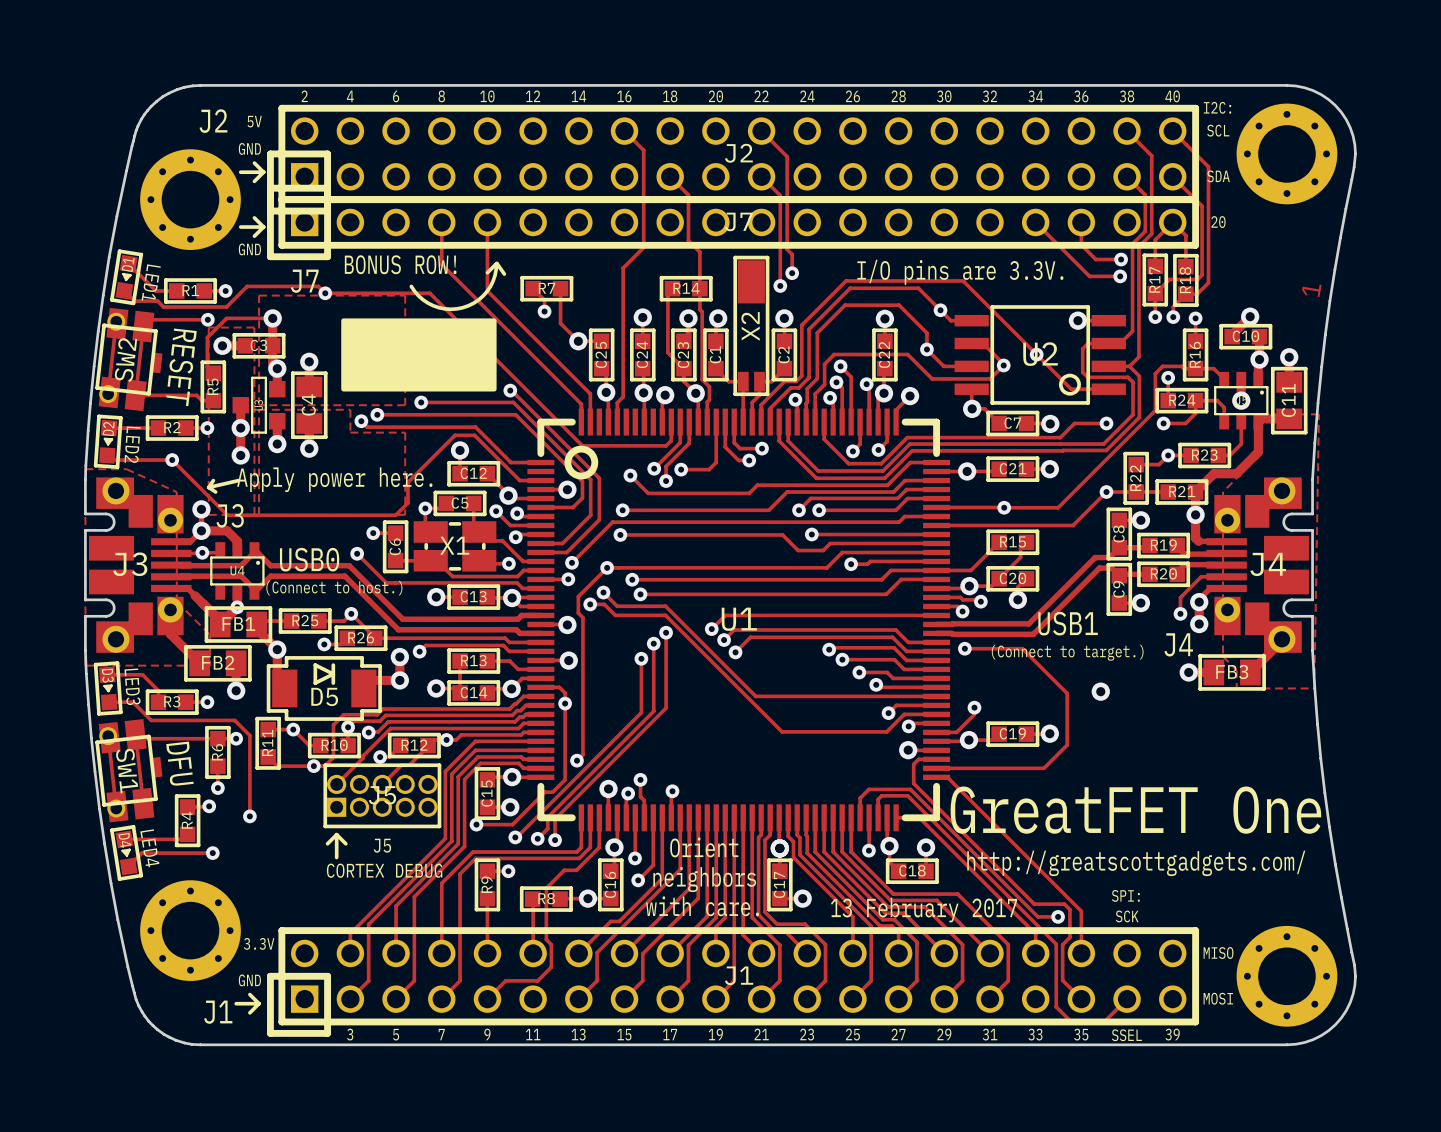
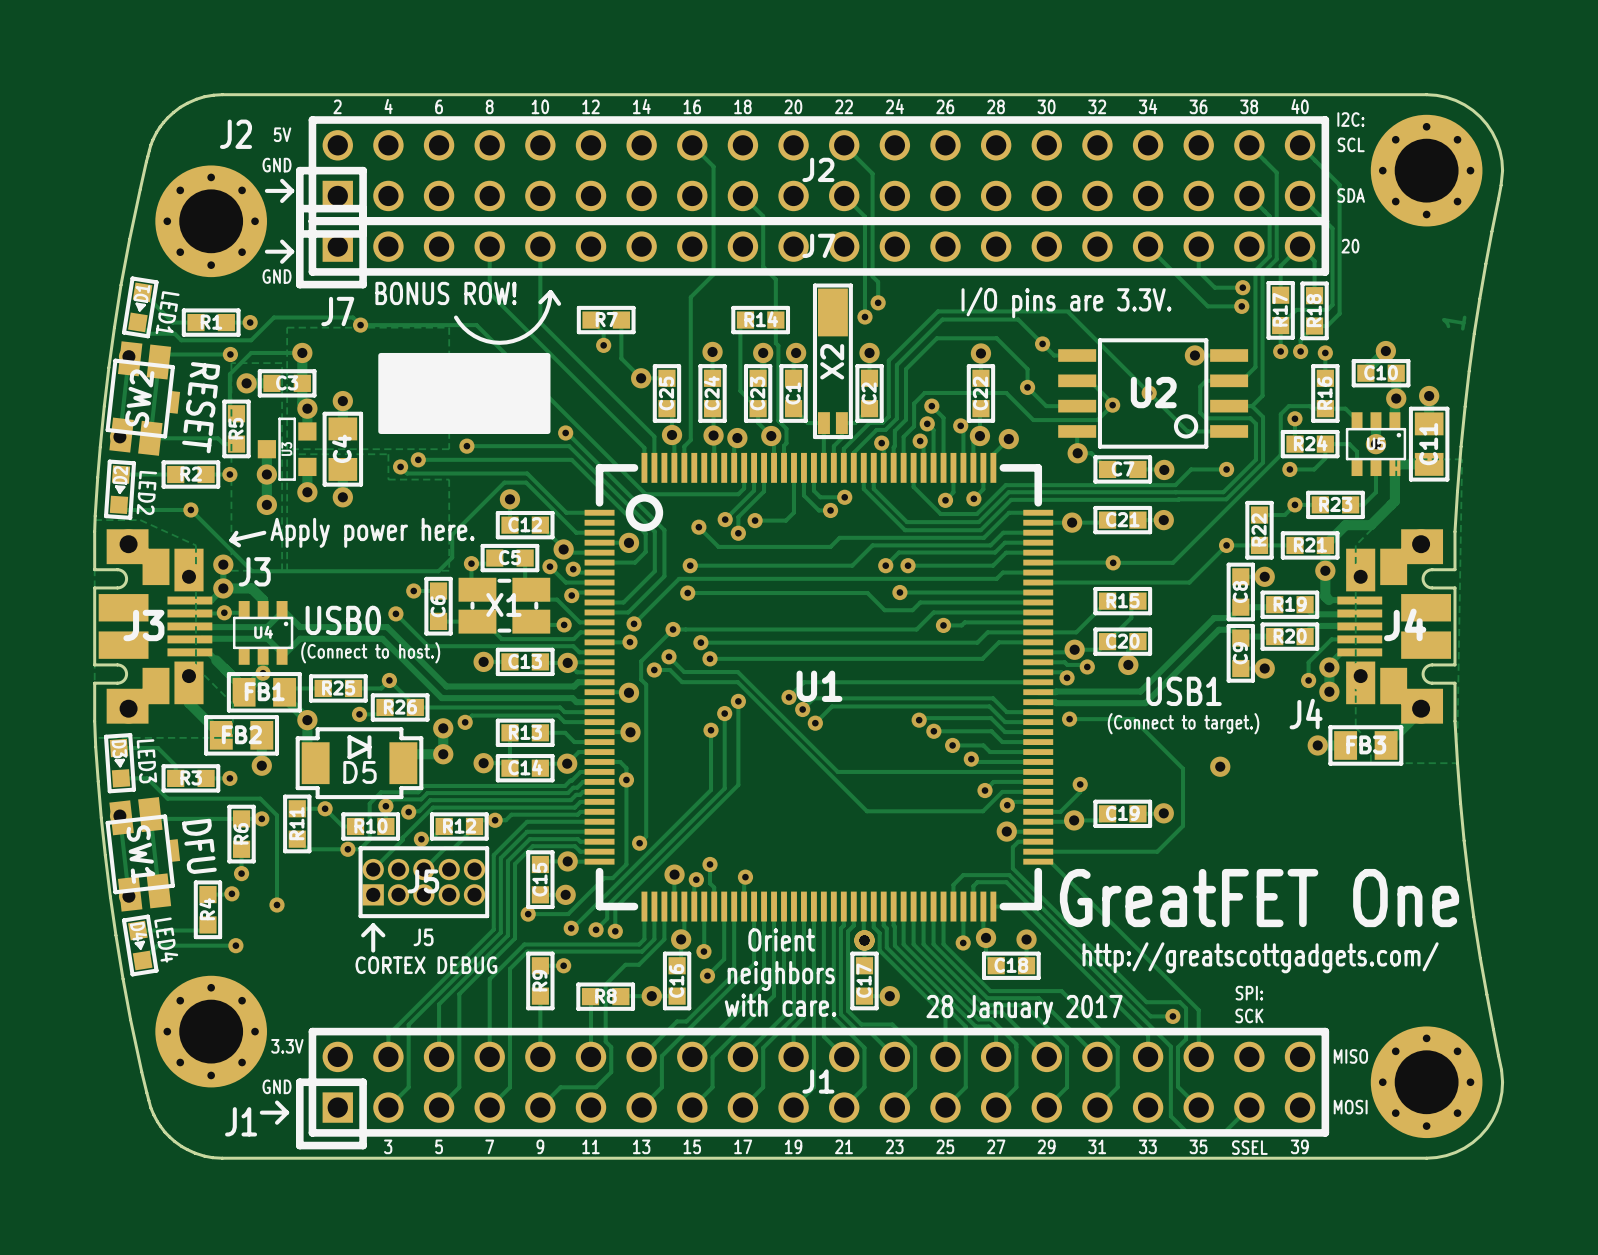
text: 13 February 2017 (924, 910) -> 28 January 2017 (1024, 1009)

